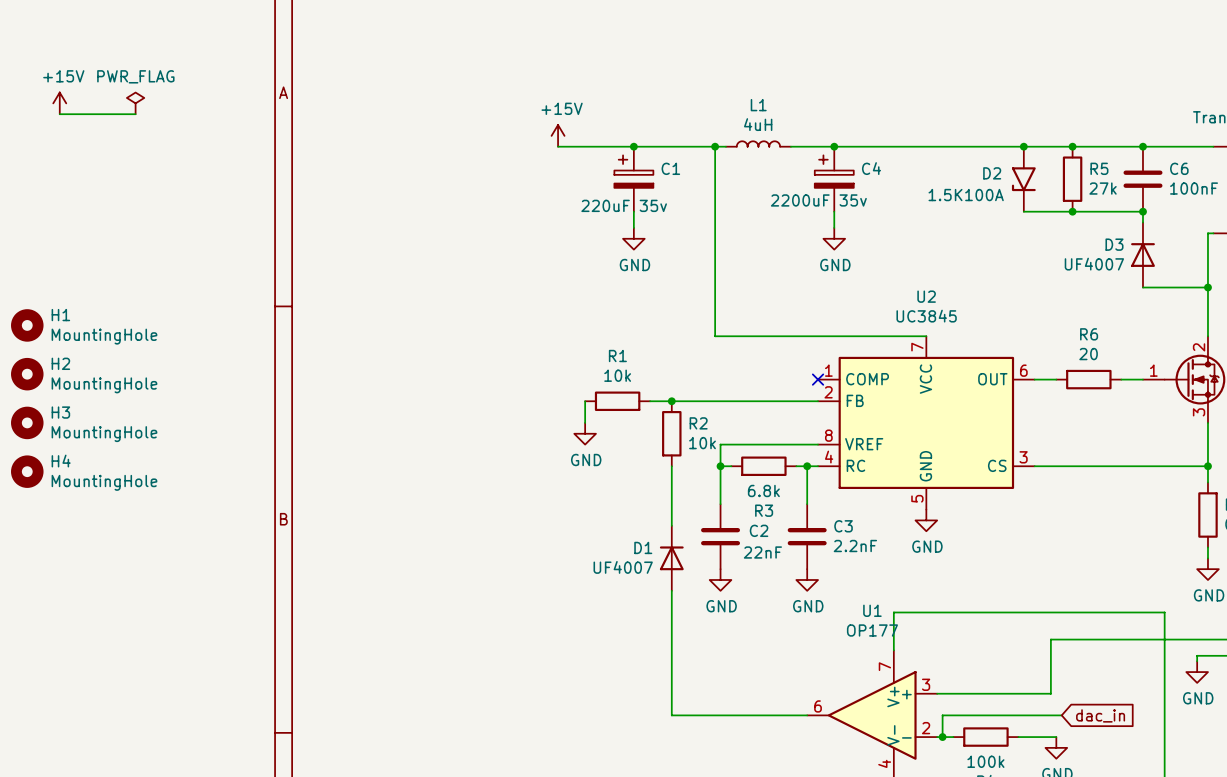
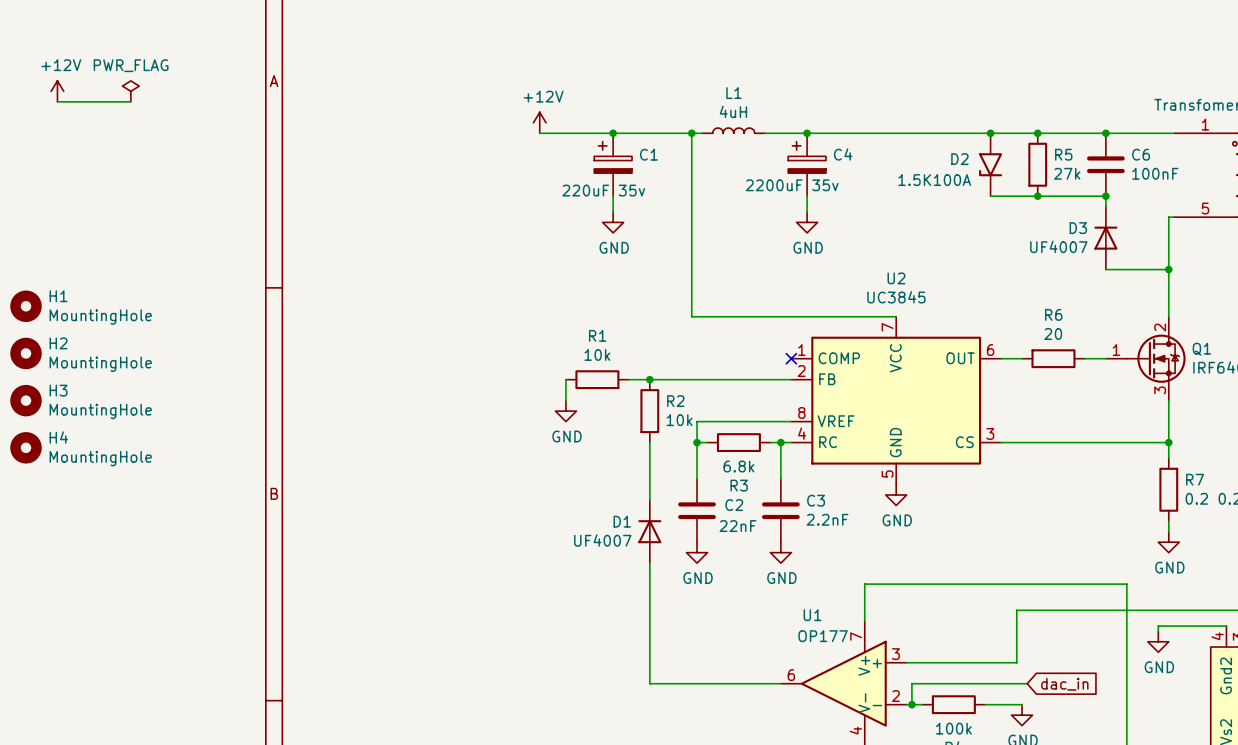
power symbol: +15V (59, 103) -> +12V (57, 91)
power symbol: +15V (558, 135) -> +12V (539, 122)
U1 name position: U1 (872, 610) -> U1 (812, 615)
U1 value position: OP177 (872, 630) -> OP177 (823, 636)

